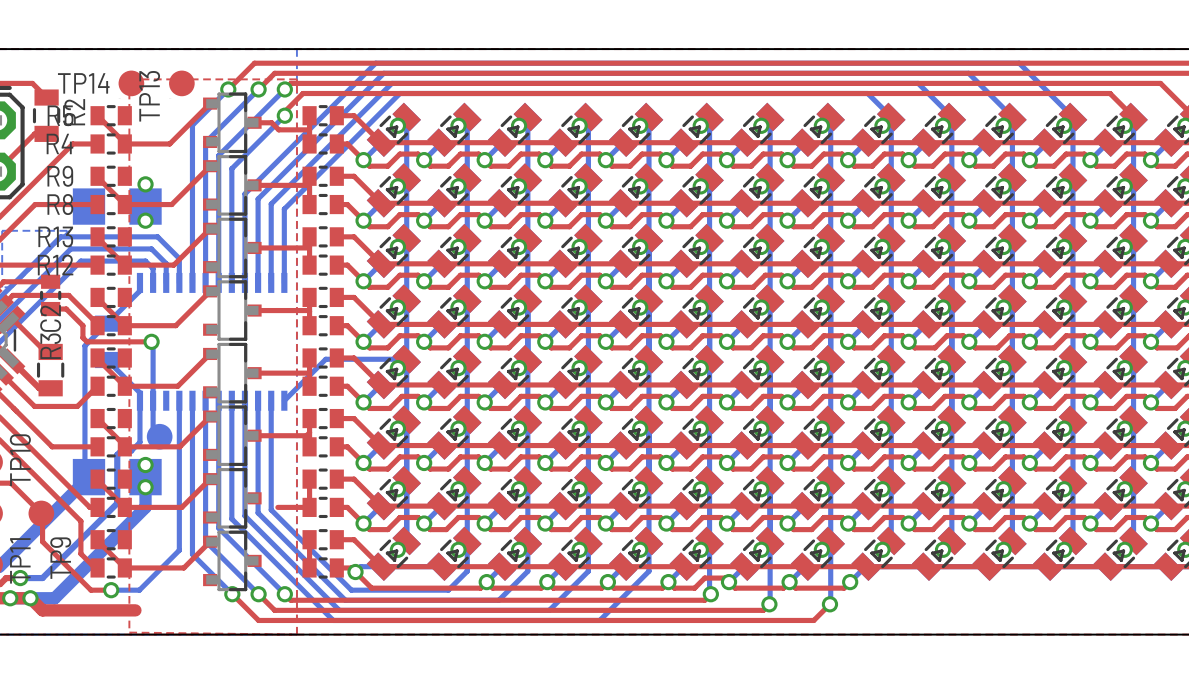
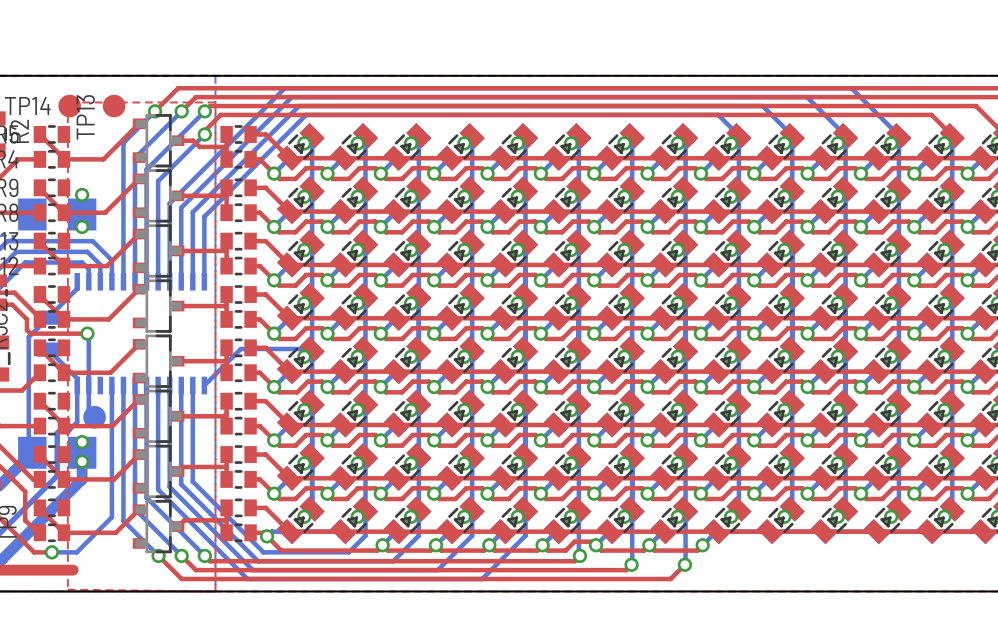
top track: none -> (226, 467) (182, 467) (178, 471)
top track: (277, 507) (309, 507) -> none
top track: none -> (226, 520) (184, 520) (178, 526)

